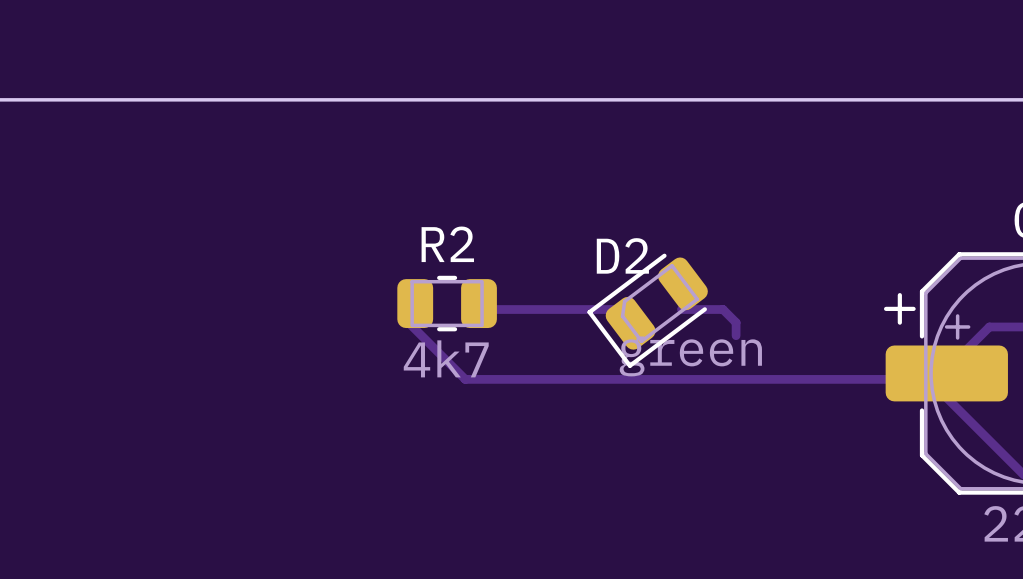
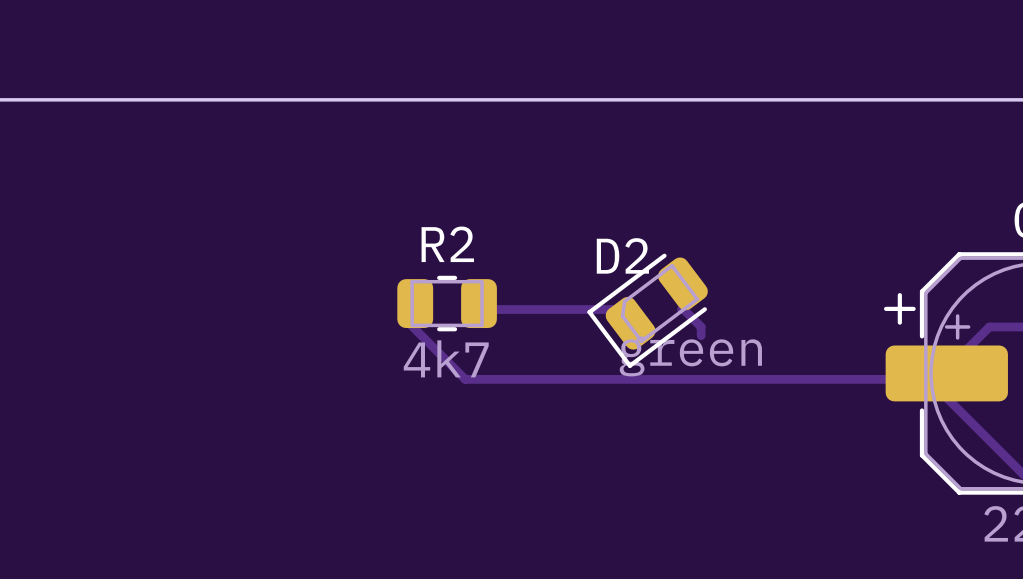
track: (683, 309) (722, 309) (736, 322) (736, 335) -> (683, 309) (701, 326) (701, 335)

